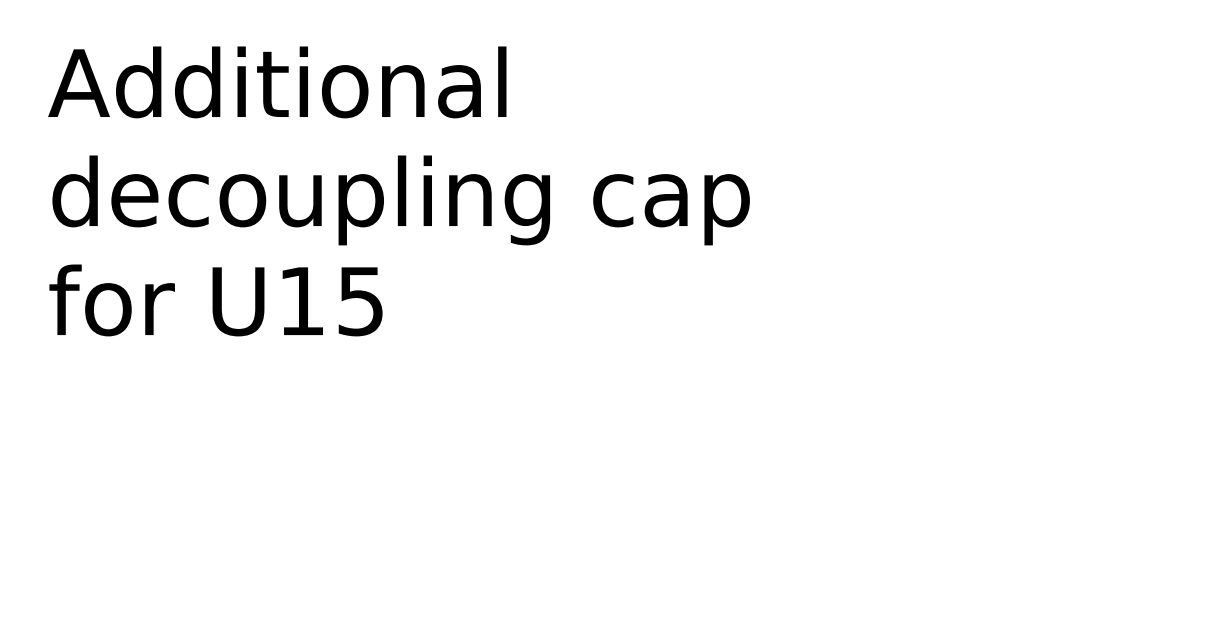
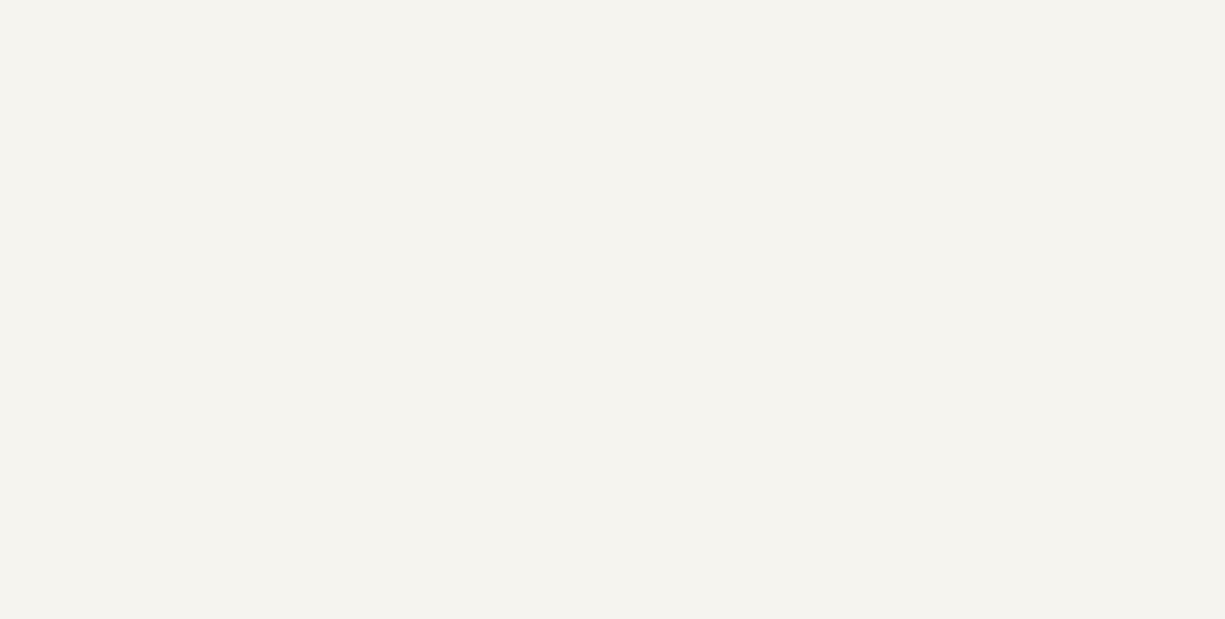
text: Additional (277, 82) -> none
text: decoupling cap (401, 200) -> none
text: for U15 (216, 300) -> none

